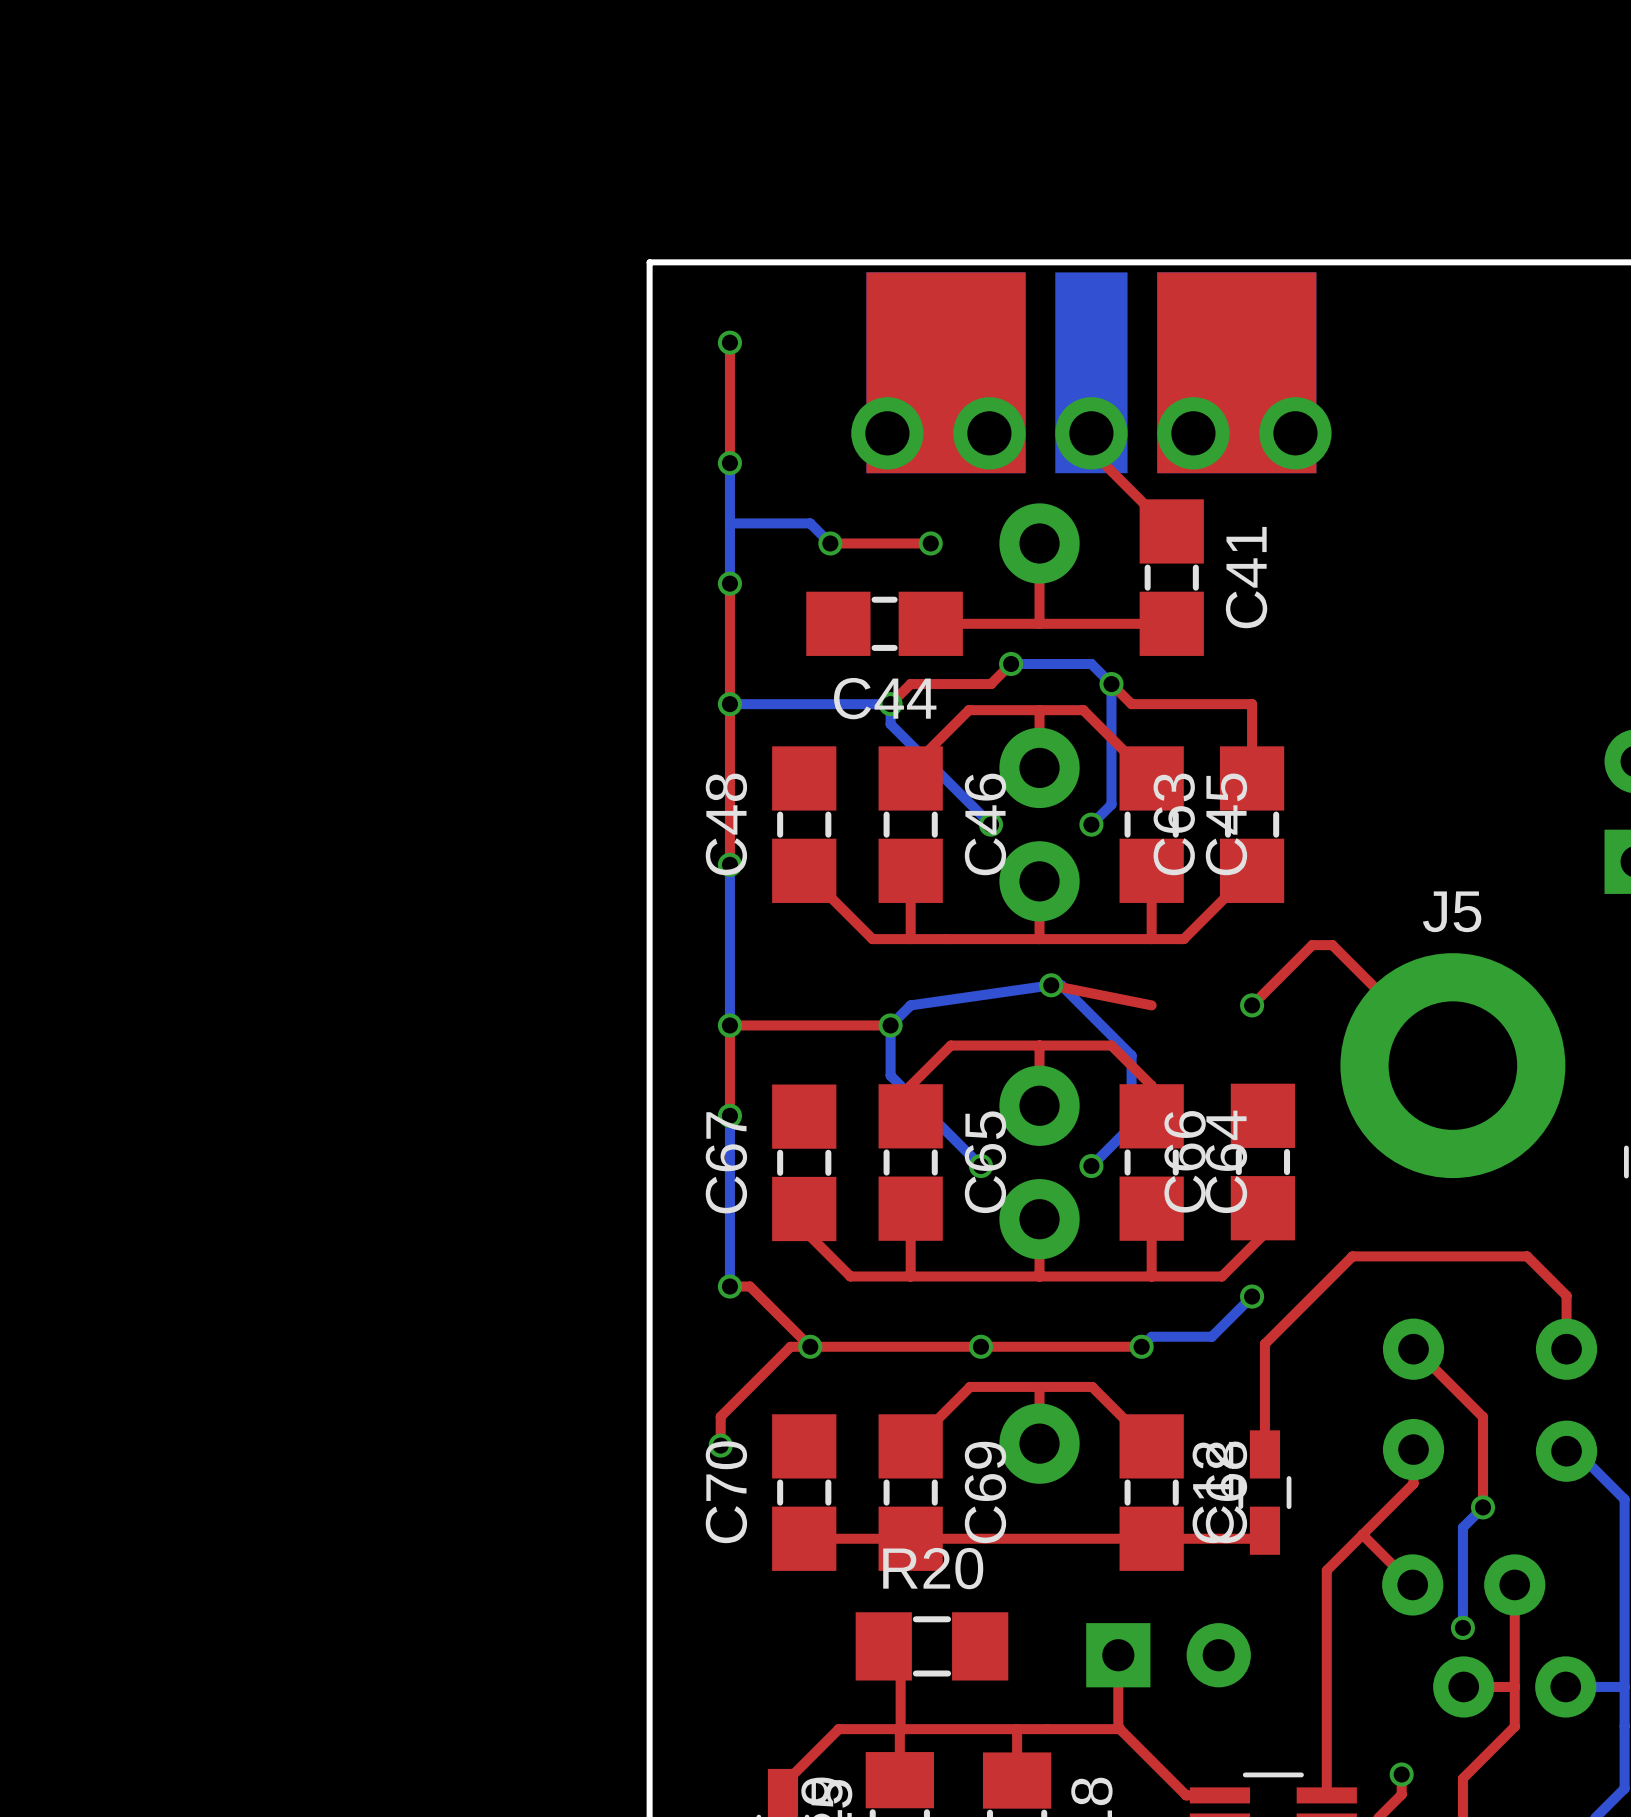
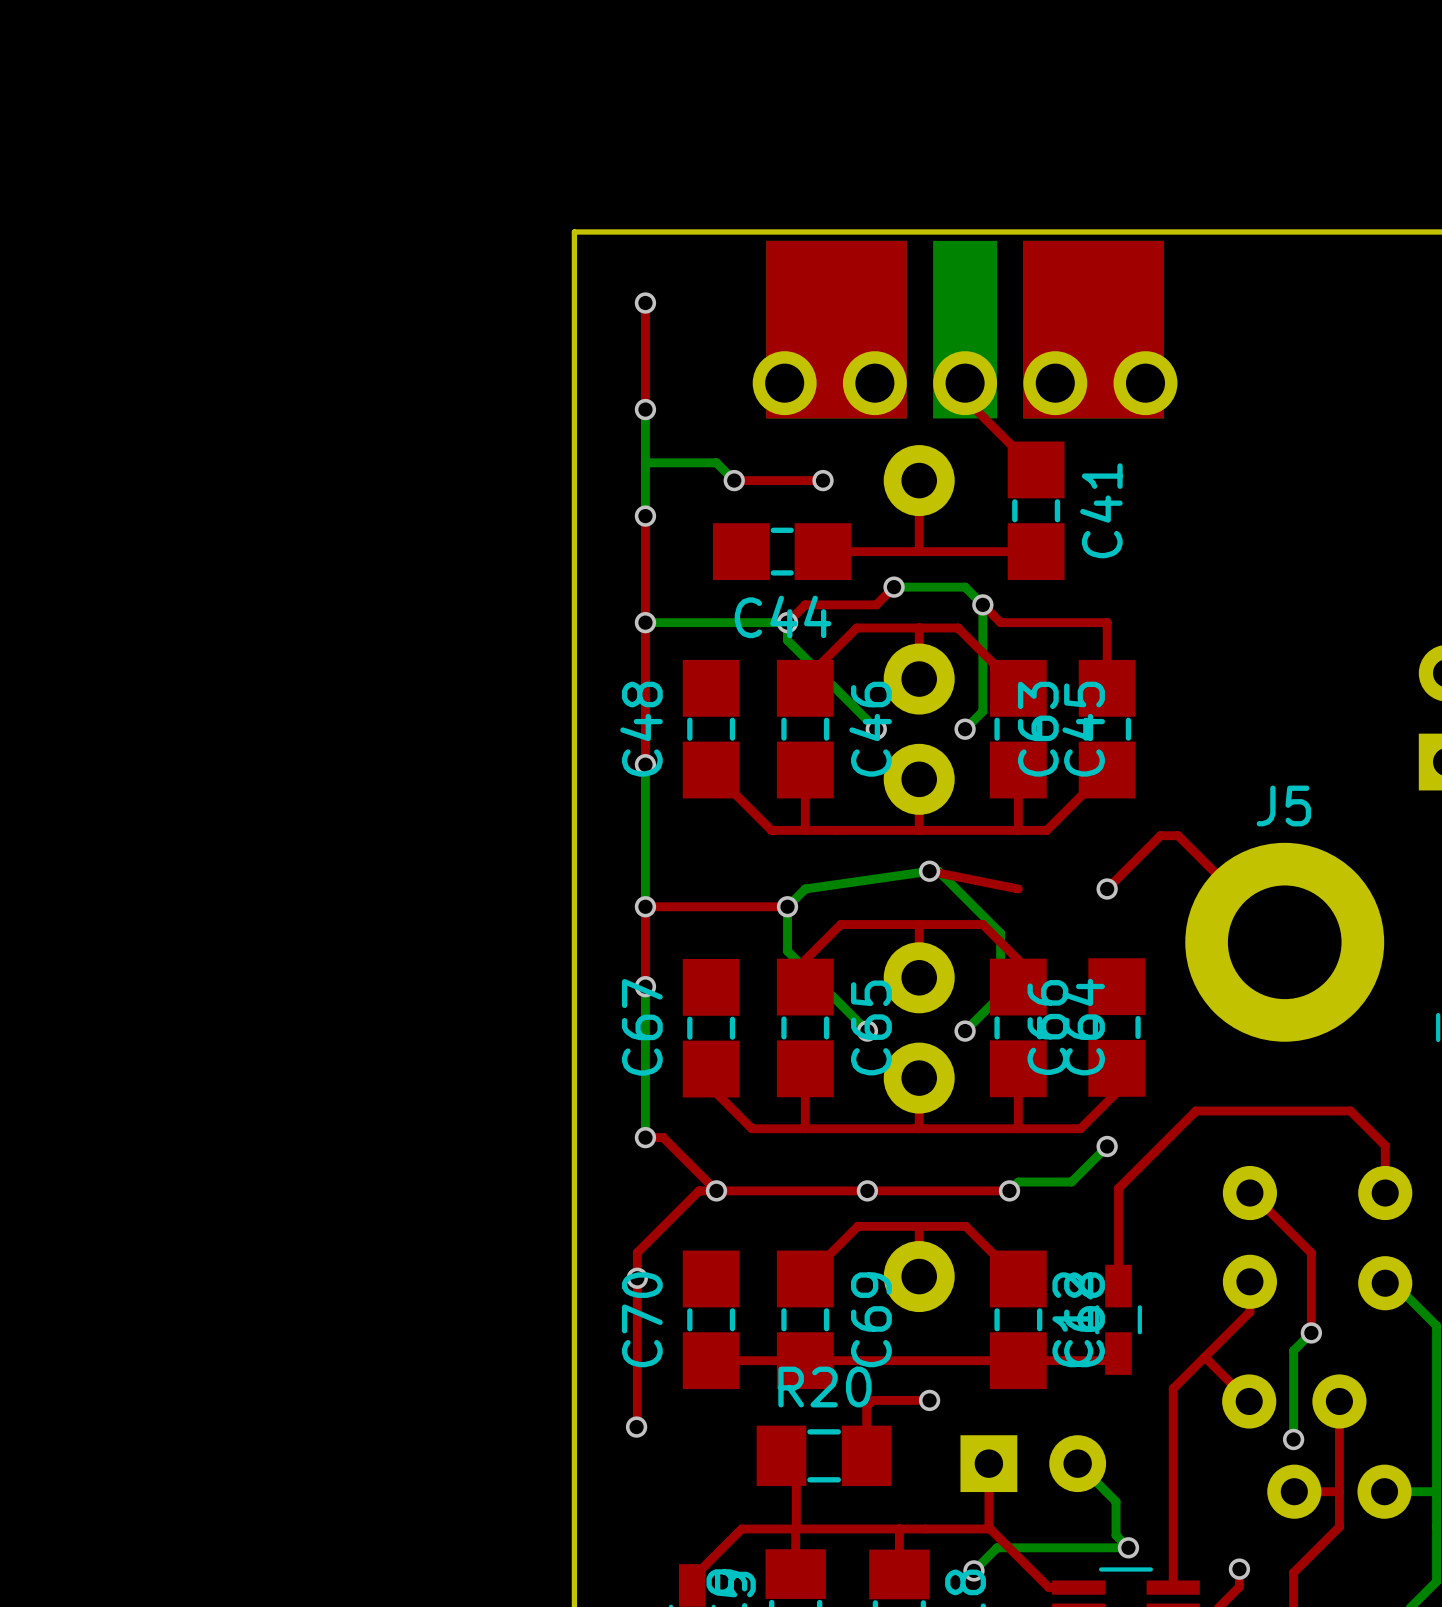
top track: none -> (637, 1278) (636, 1427)
top track: none -> (929, 1400) (872, 1400) (866, 1406) (866, 1455)
via: none -> (929, 1400)
via: none -> (636, 1427)
bottom track: none -> (1078, 1463) (1116, 1501) (1116, 1535) (1128, 1547) (997, 1547) (973, 1570)
via: none -> (1128, 1547)
via: none -> (973, 1570)

